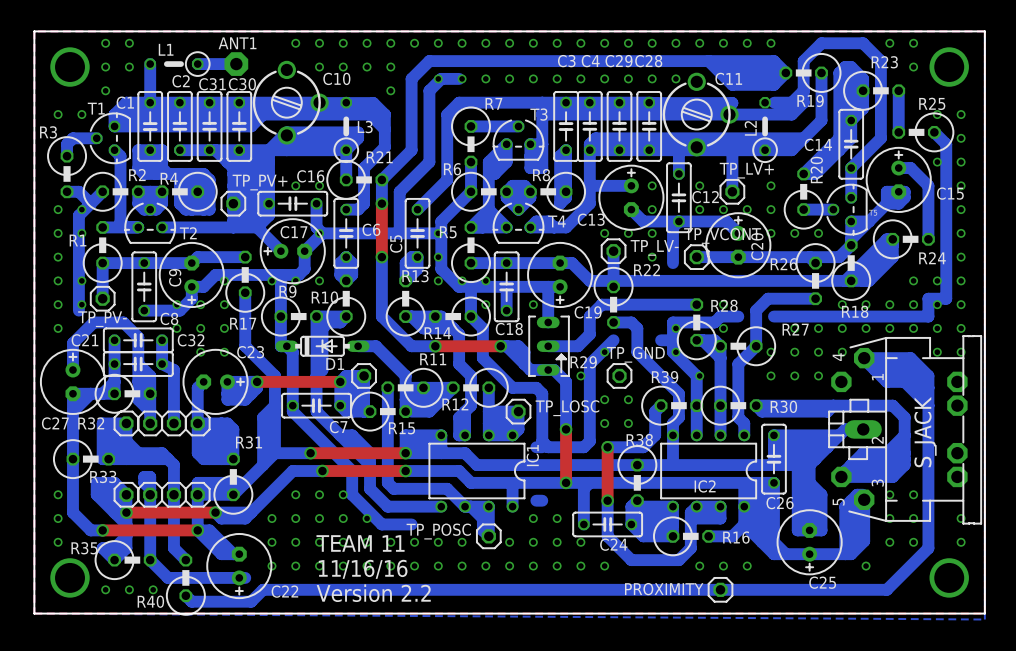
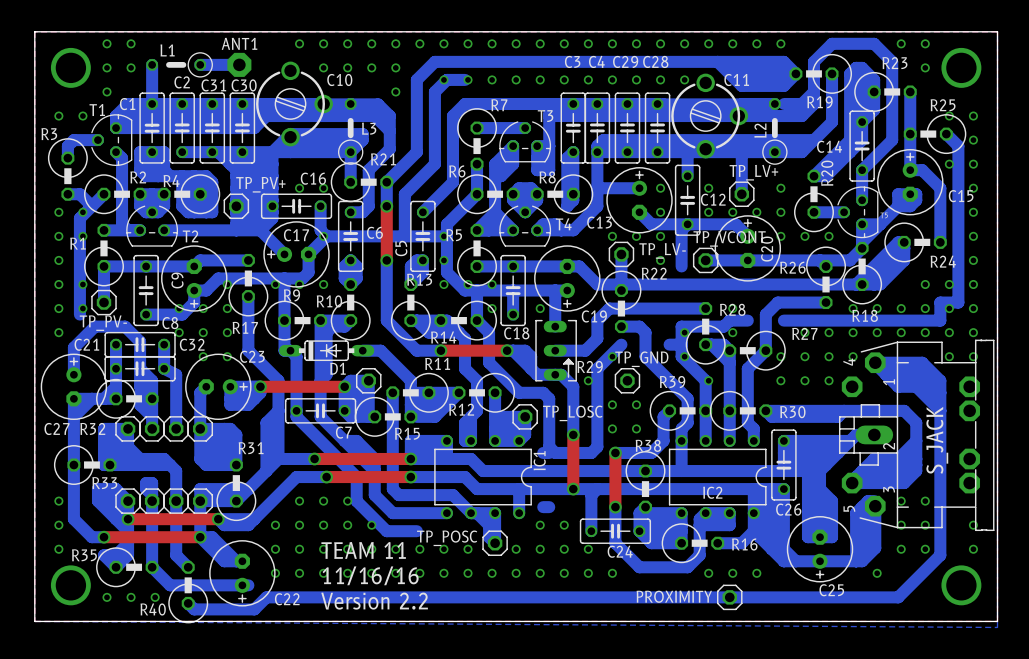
bottom track: none -> (774, 103) (741, 104)
bottom track: none -> (910, 134) (910, 170)

